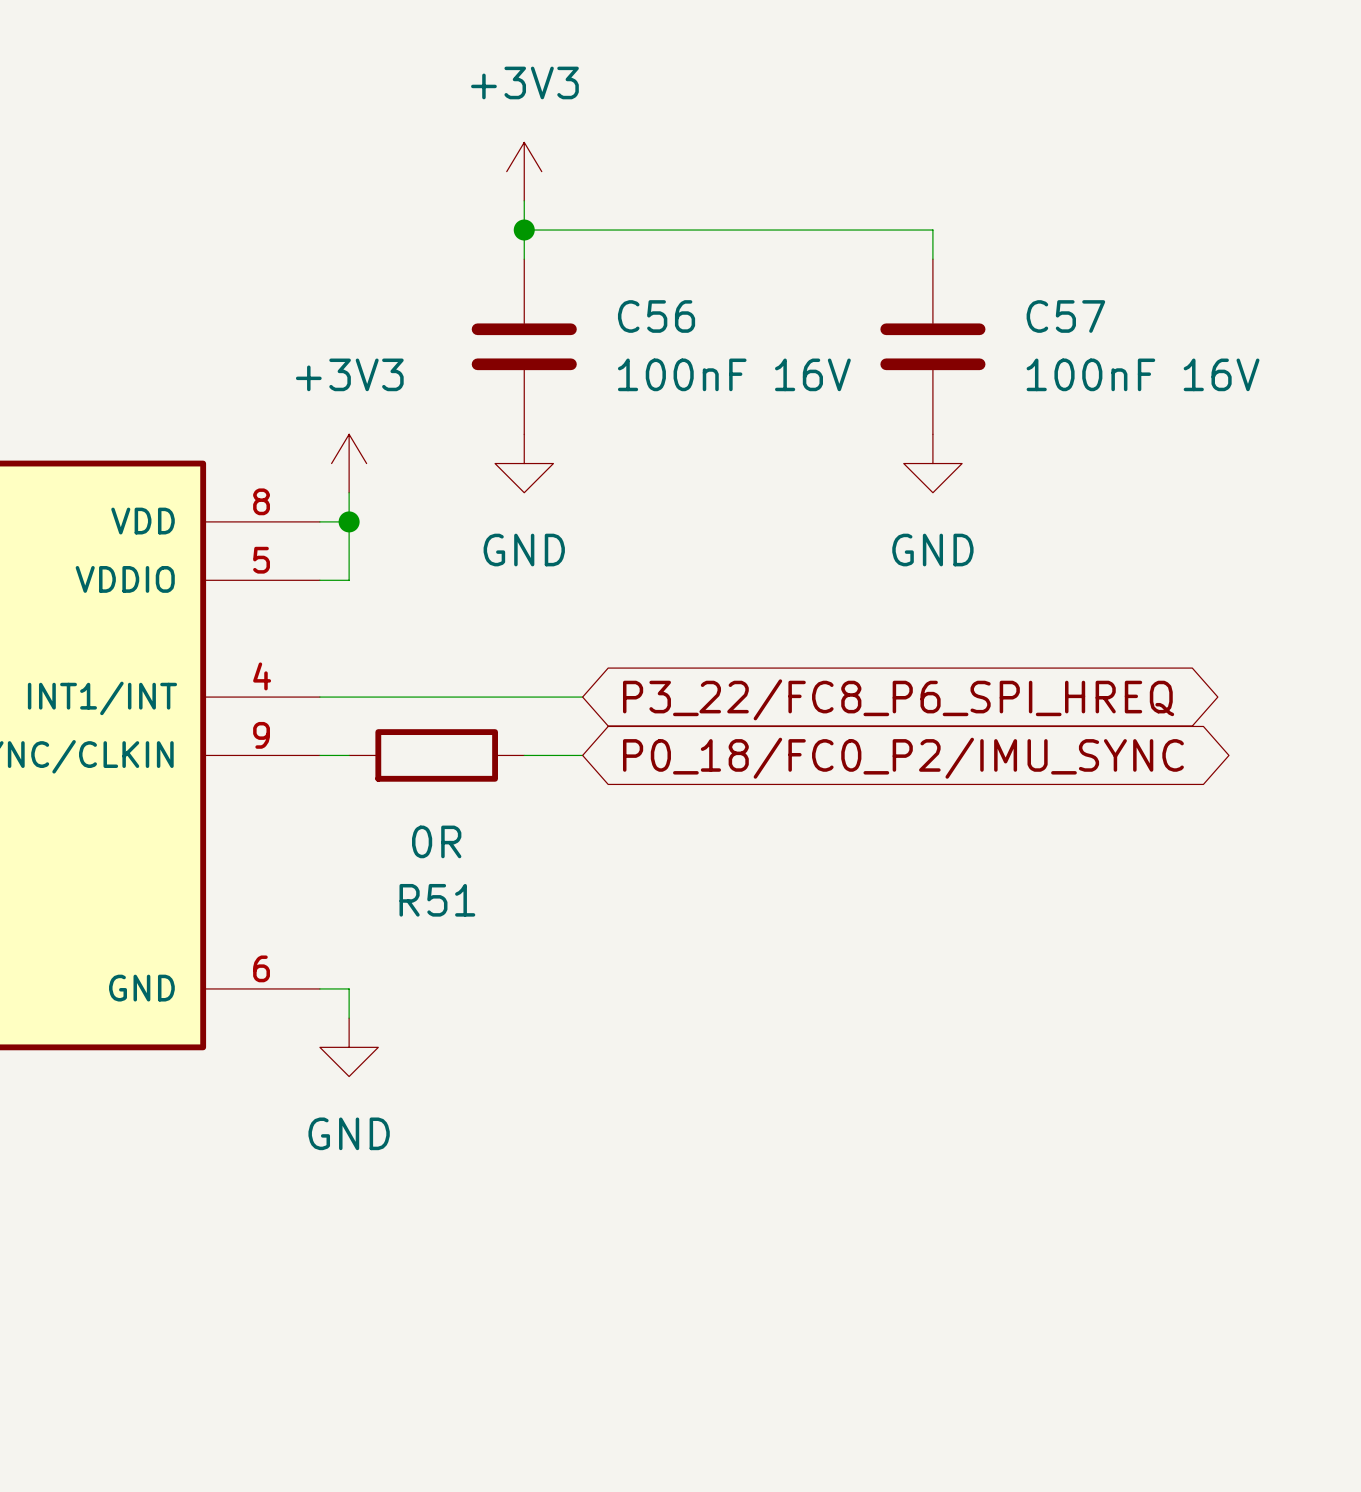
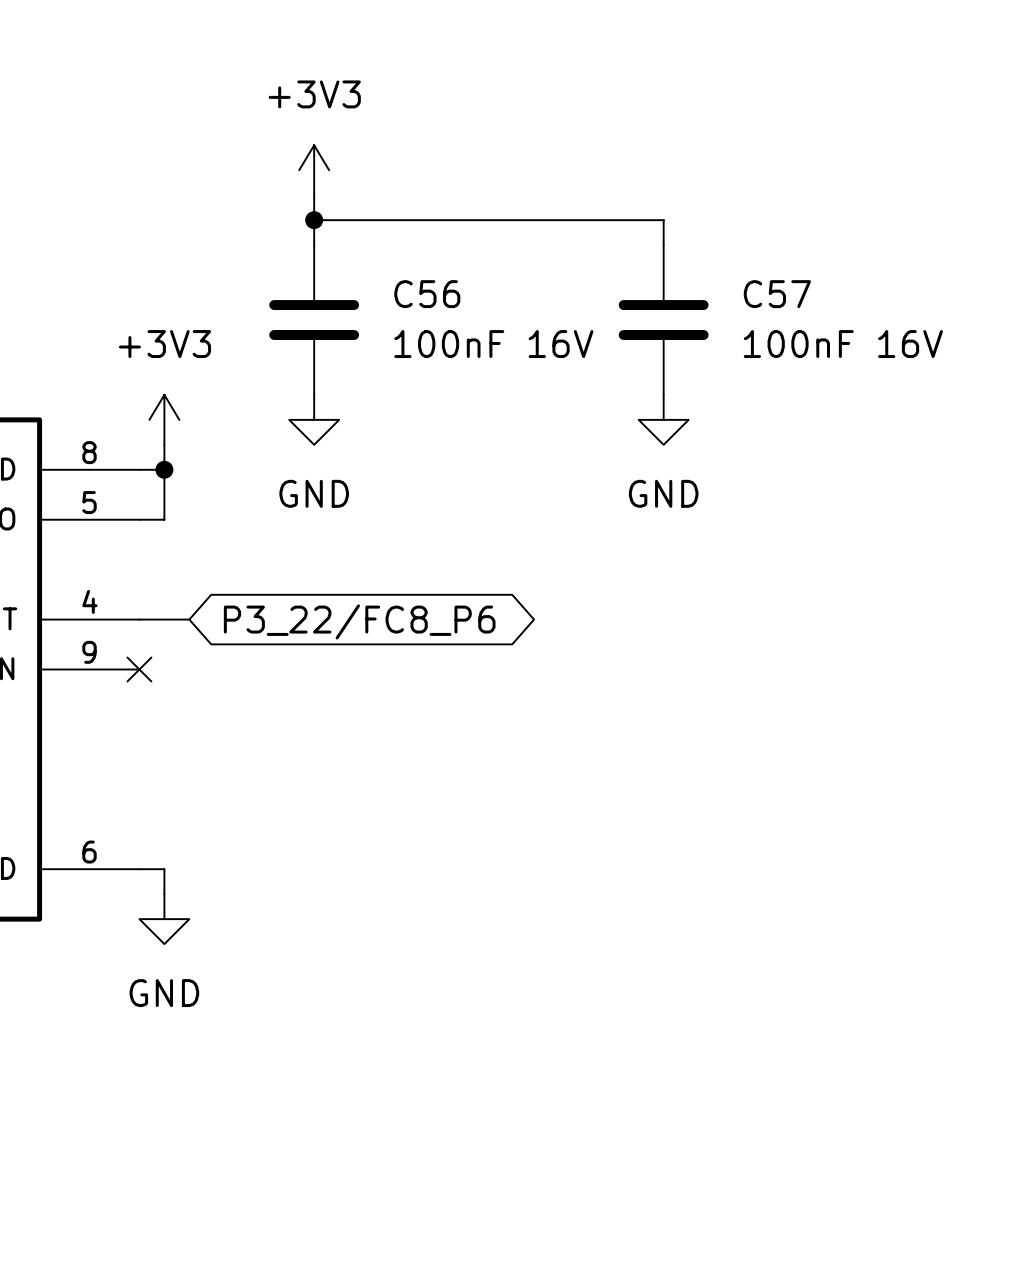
wire: (378, 697) (582, 697) -> none
global label: P3_22/FC8_P6_SPI_HREQ (898, 699) -> P3_22/FC8_P6 (359, 621)
wire: (319, 755) (349, 755) -> none
no-connect mark: none -> (139, 669)
R51: 0R (436, 755) -> none
wire: (524, 755) (582, 755) -> none
global label: P0_18/FC0_P2/IMU_SYNC (903, 758) -> none

